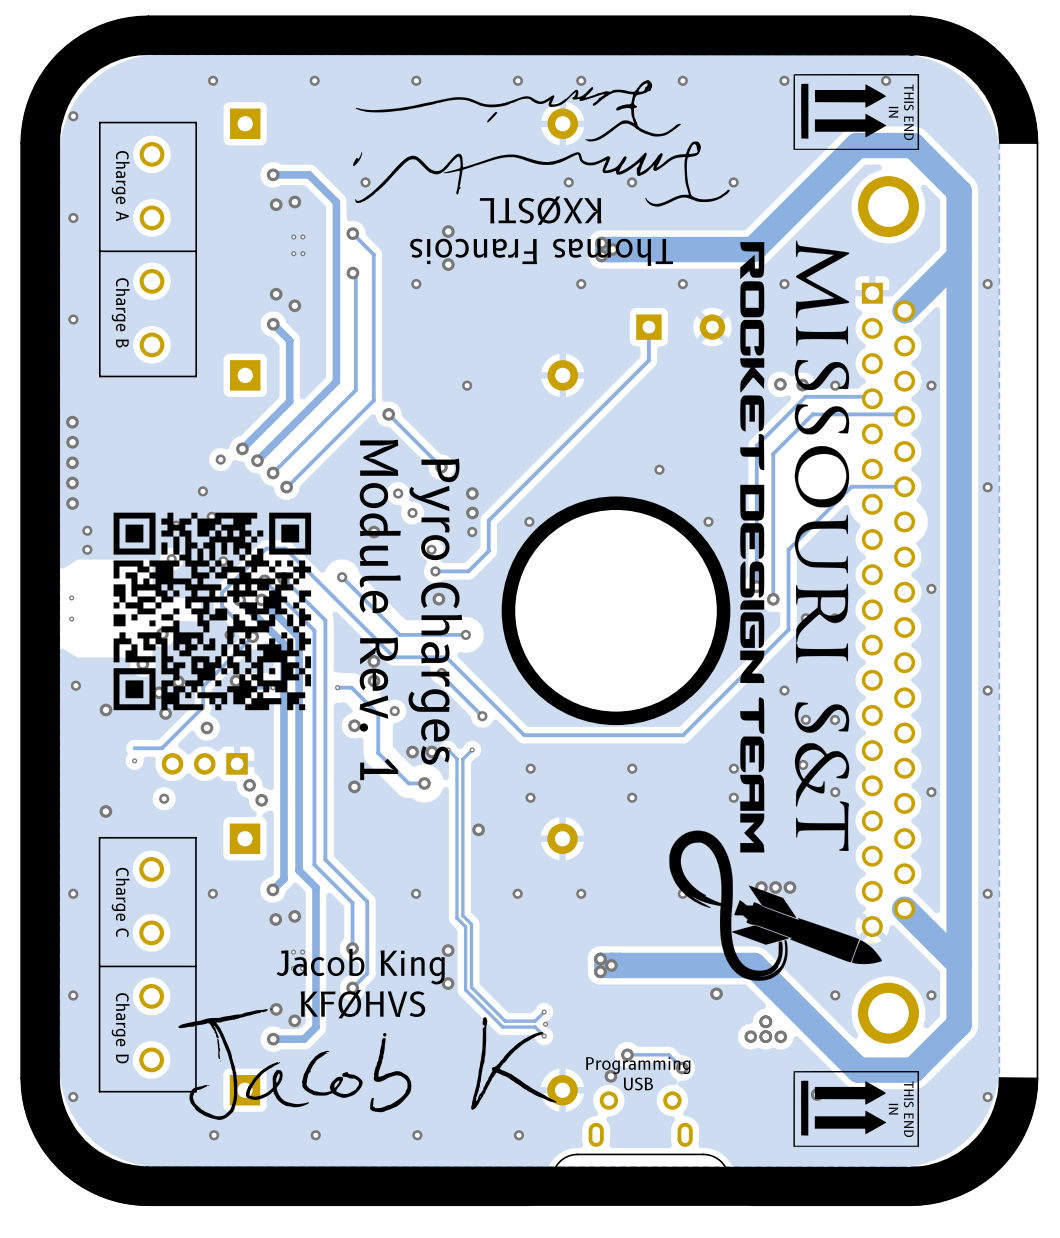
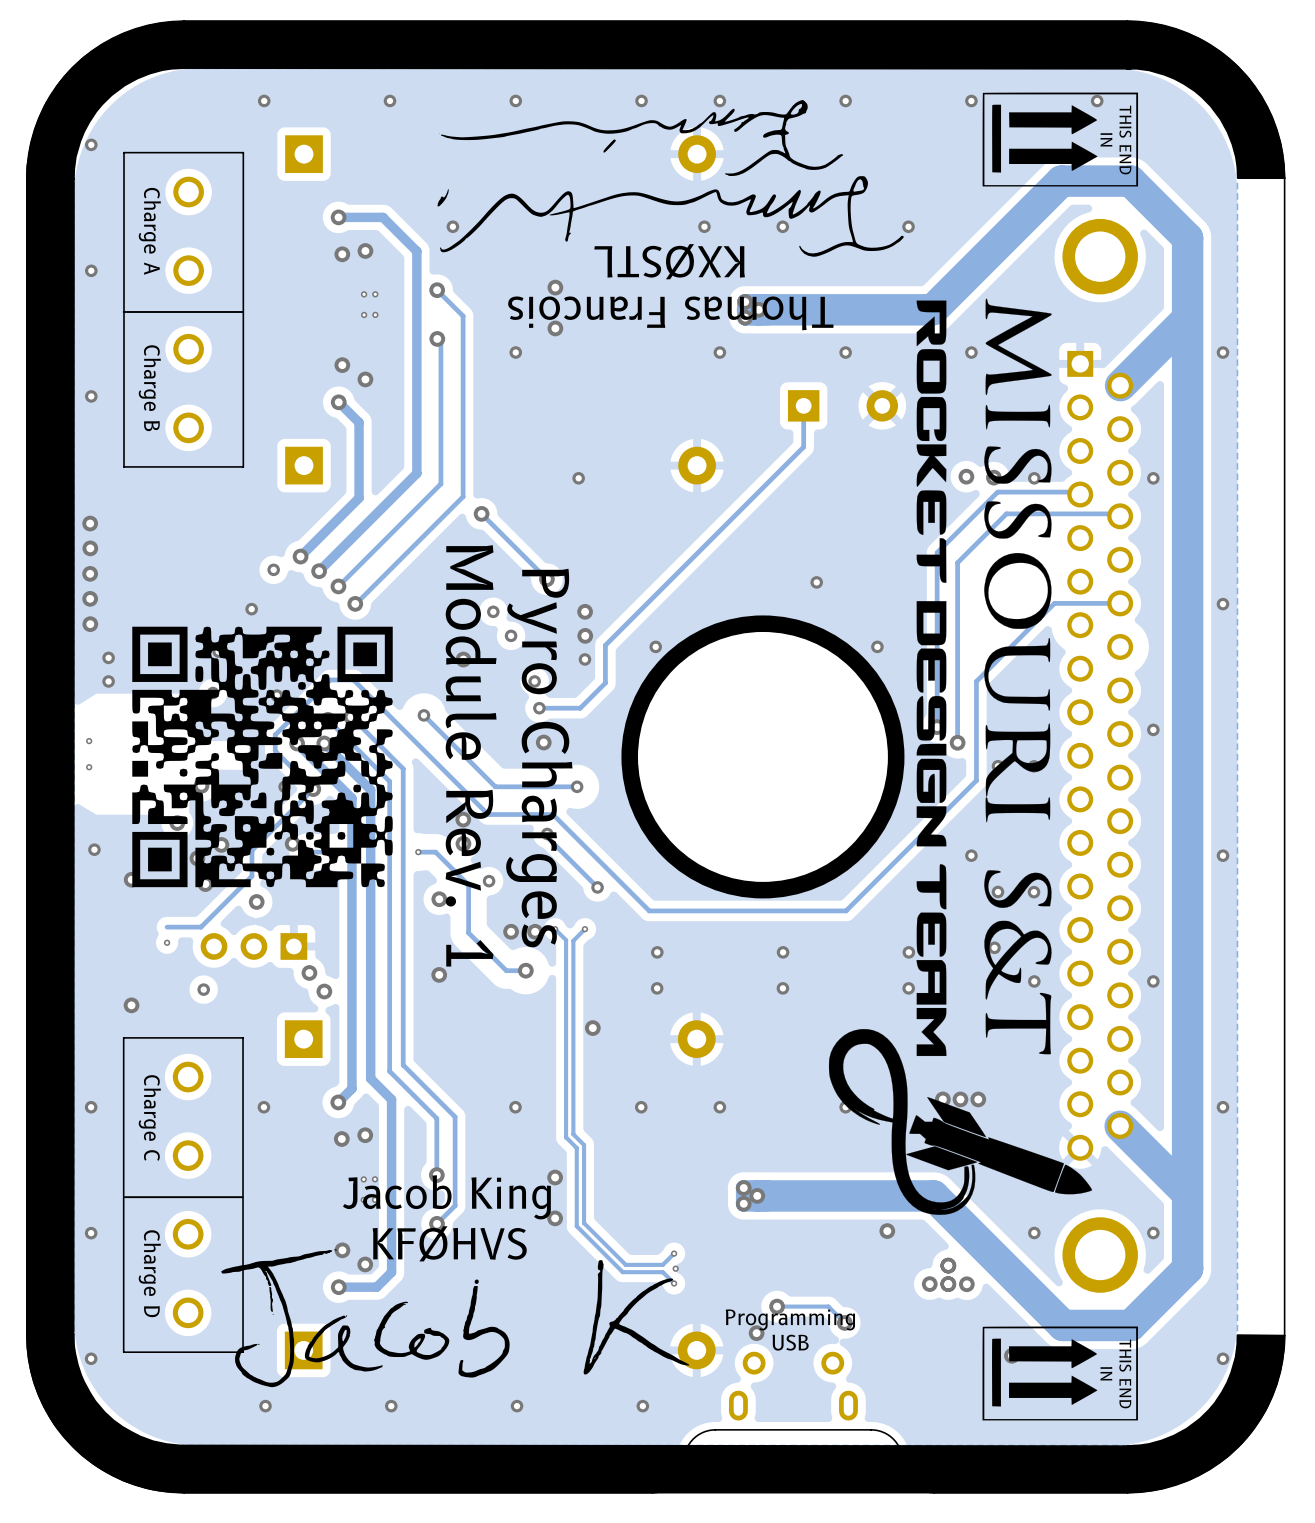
drawing shape: [113, 512, 312, 711] -> [132, 626, 393, 888]

